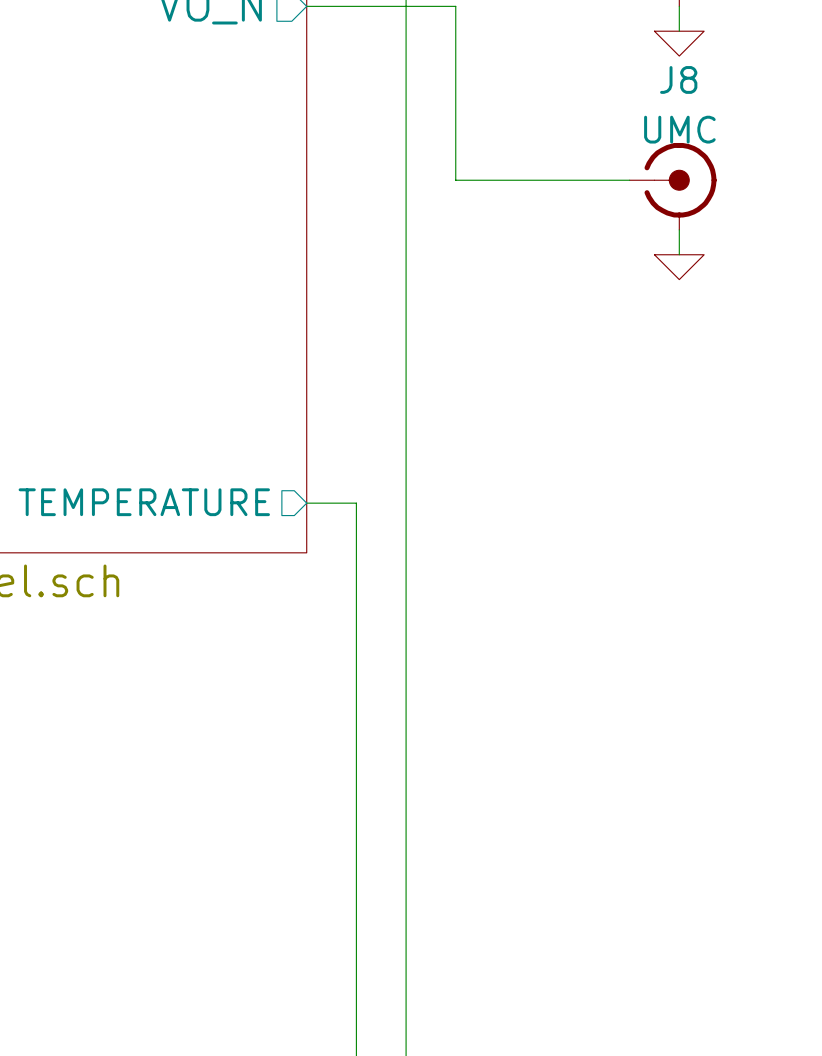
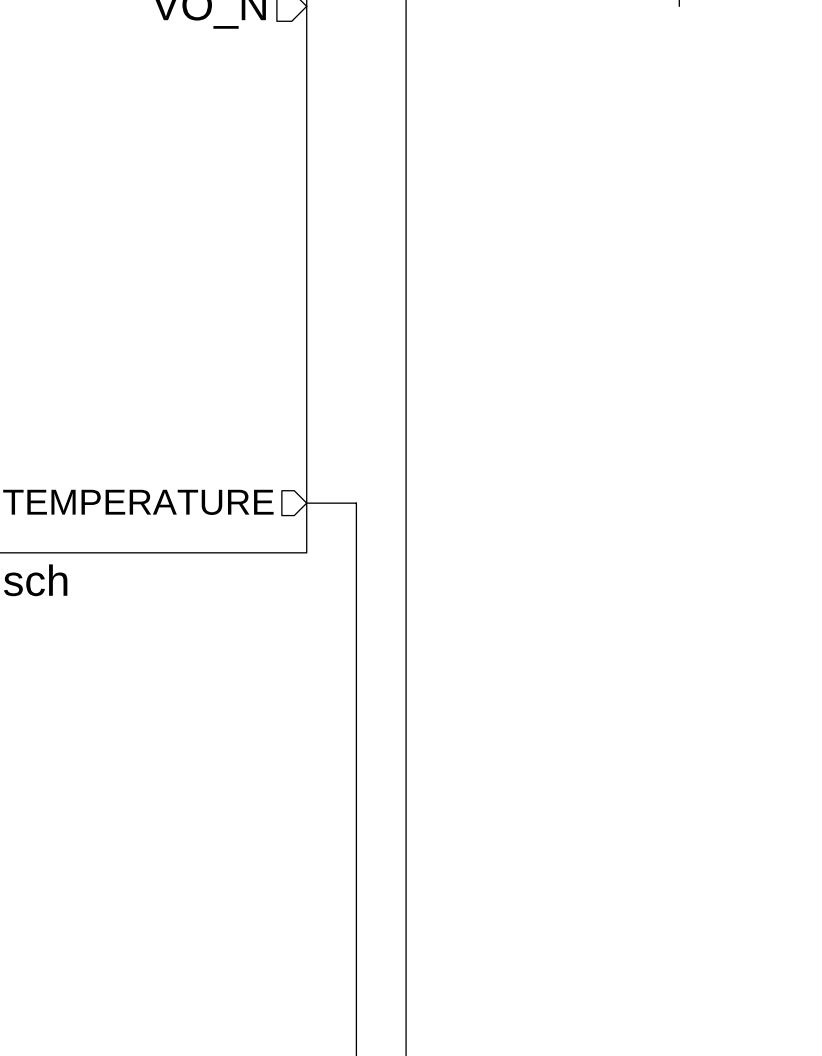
wire: (306, 6) (455, 6) (455, 180) (629, 180) -> none
wire: (679, 6) (679, 31) -> none
power symbol: (679, 43) -> none
J8: UMC (673, 186) -> none
wire: (679, 229) (679, 254) -> none
power symbol: (679, 267) -> none

